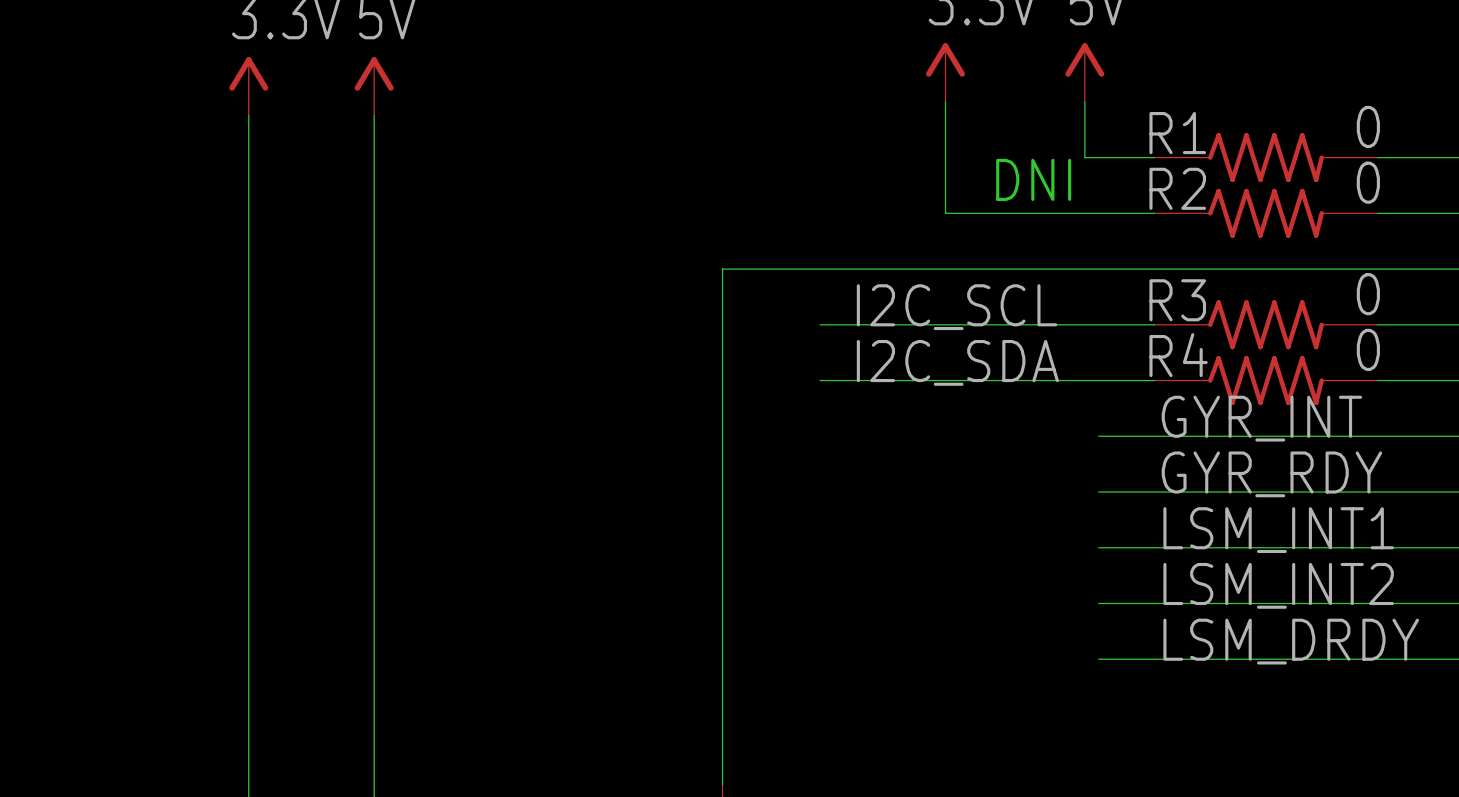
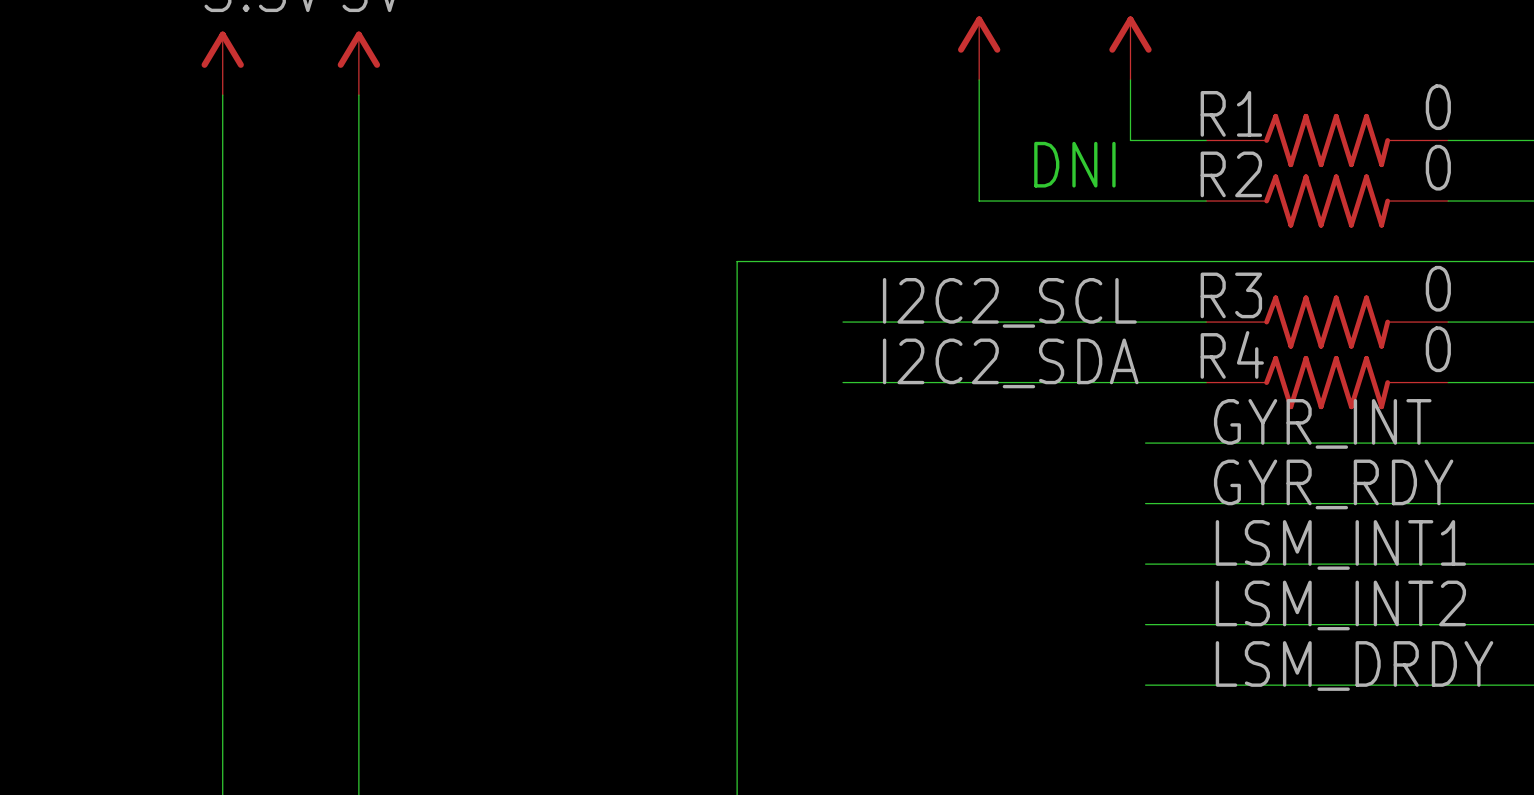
label: I2C_SCL (957, 307) -> I2C2_SCL (1009, 302)
label: I2C_SDA (957, 362) -> I2C2_SDA (1010, 363)

